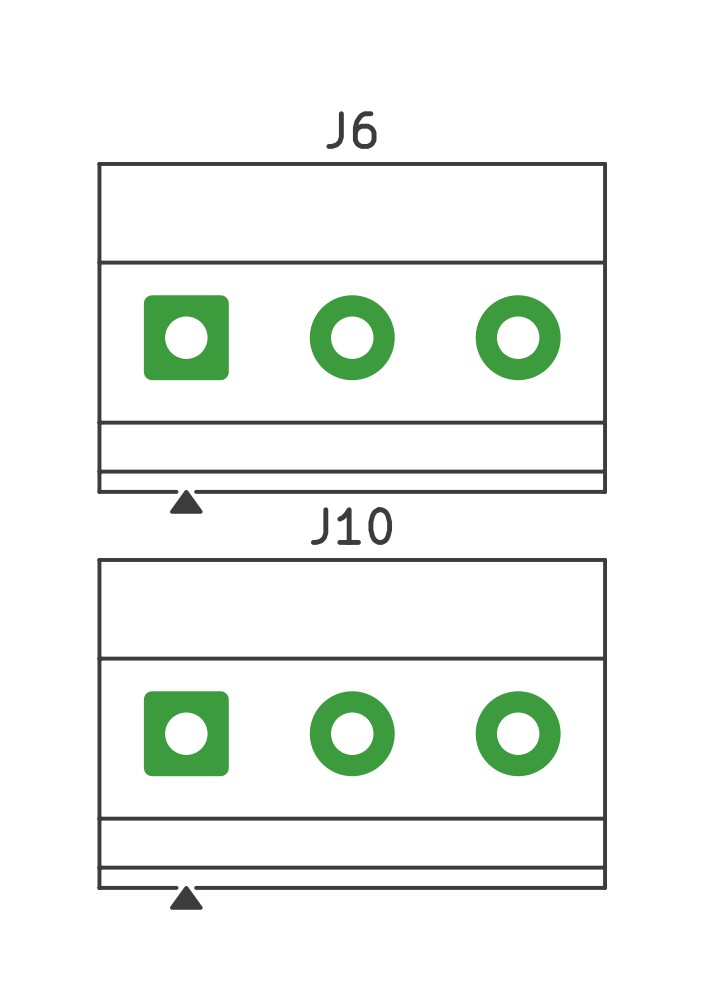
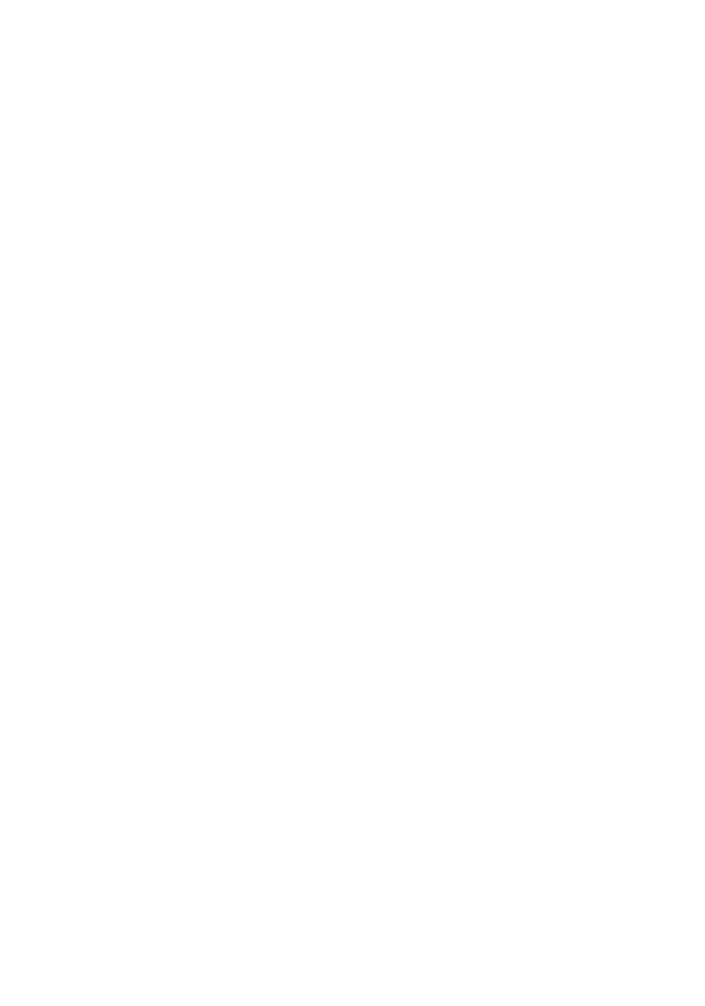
J6: (352, 337) -> none
J10: (352, 733) -> none

